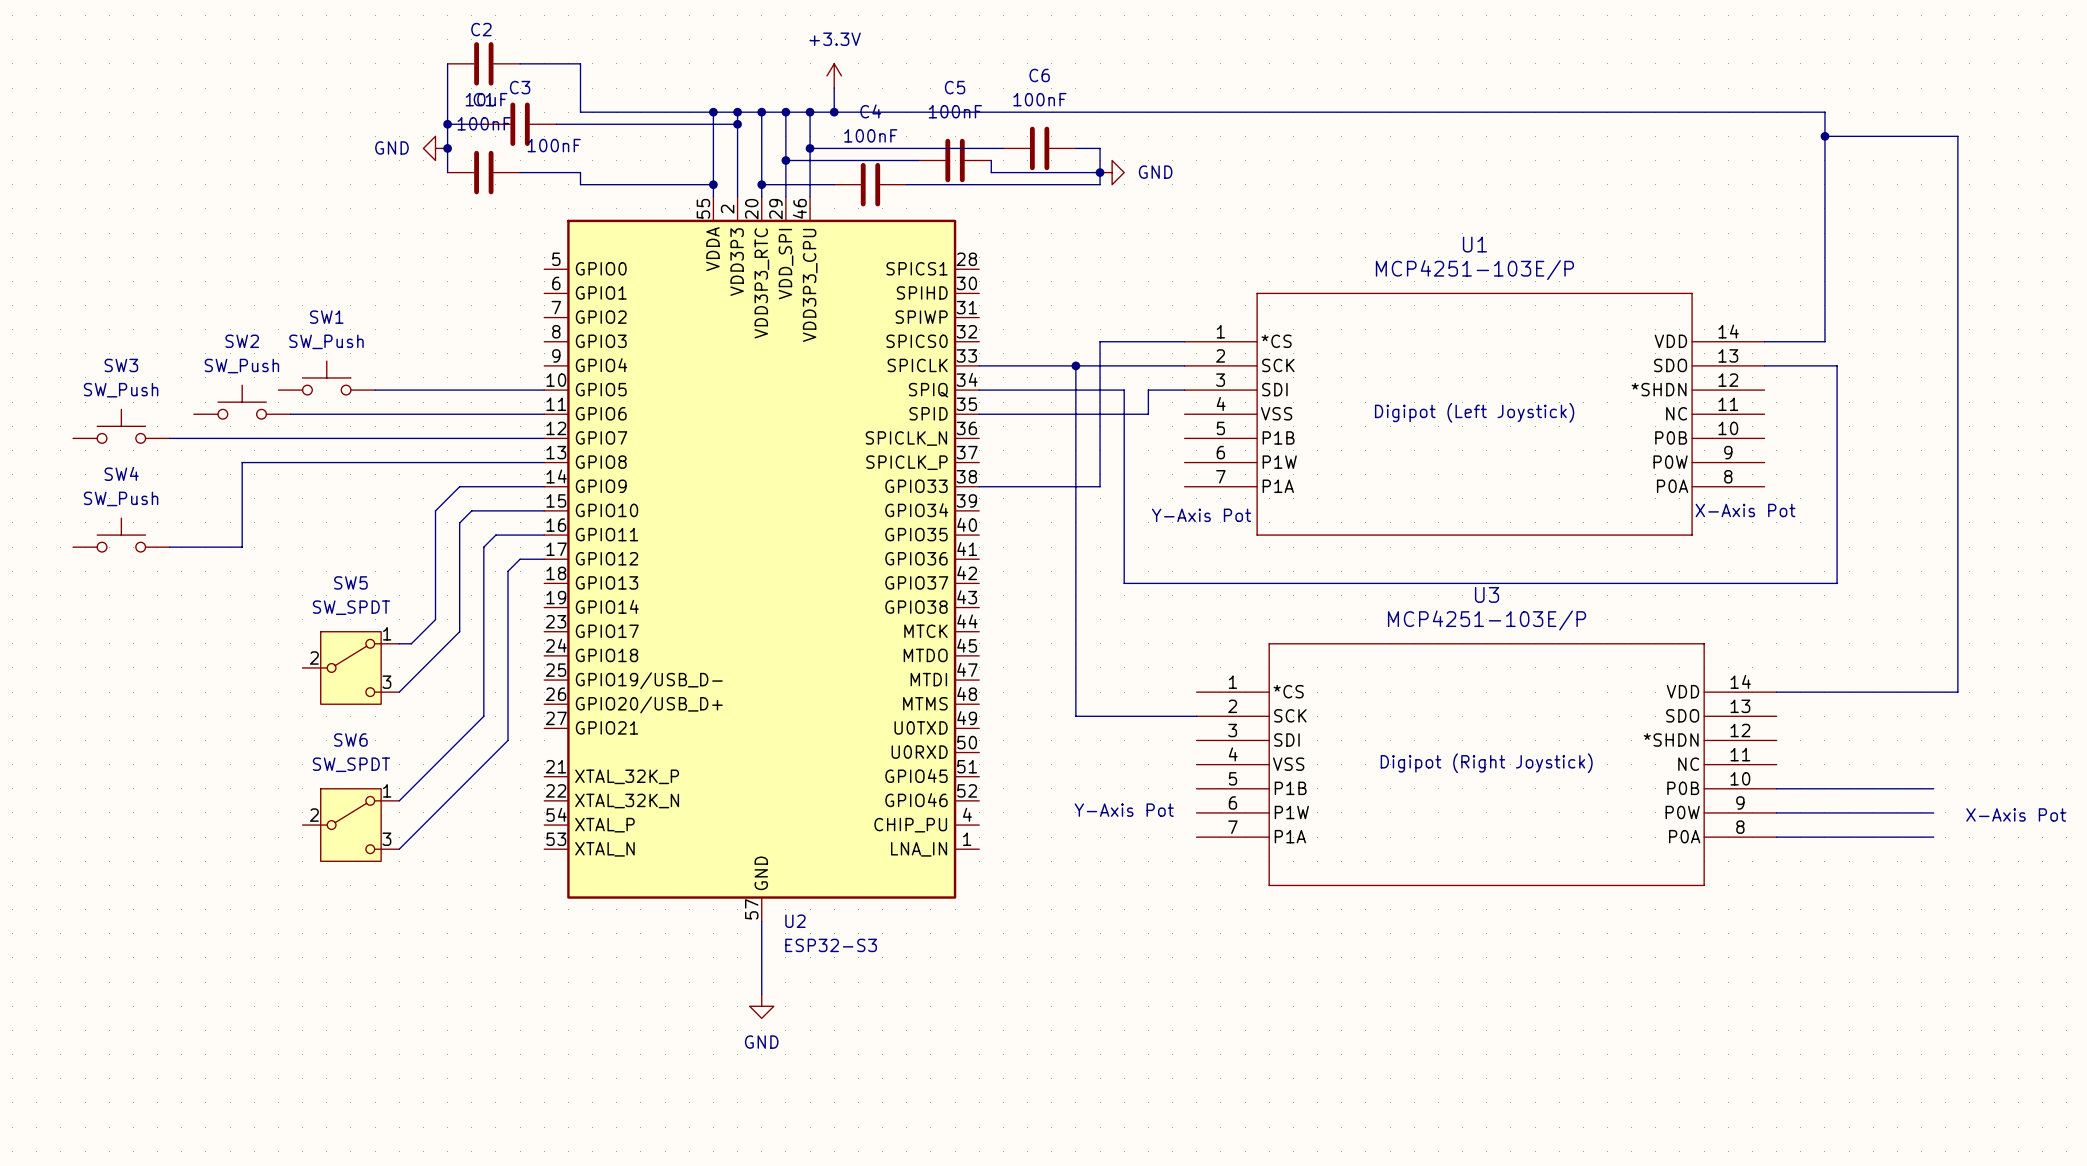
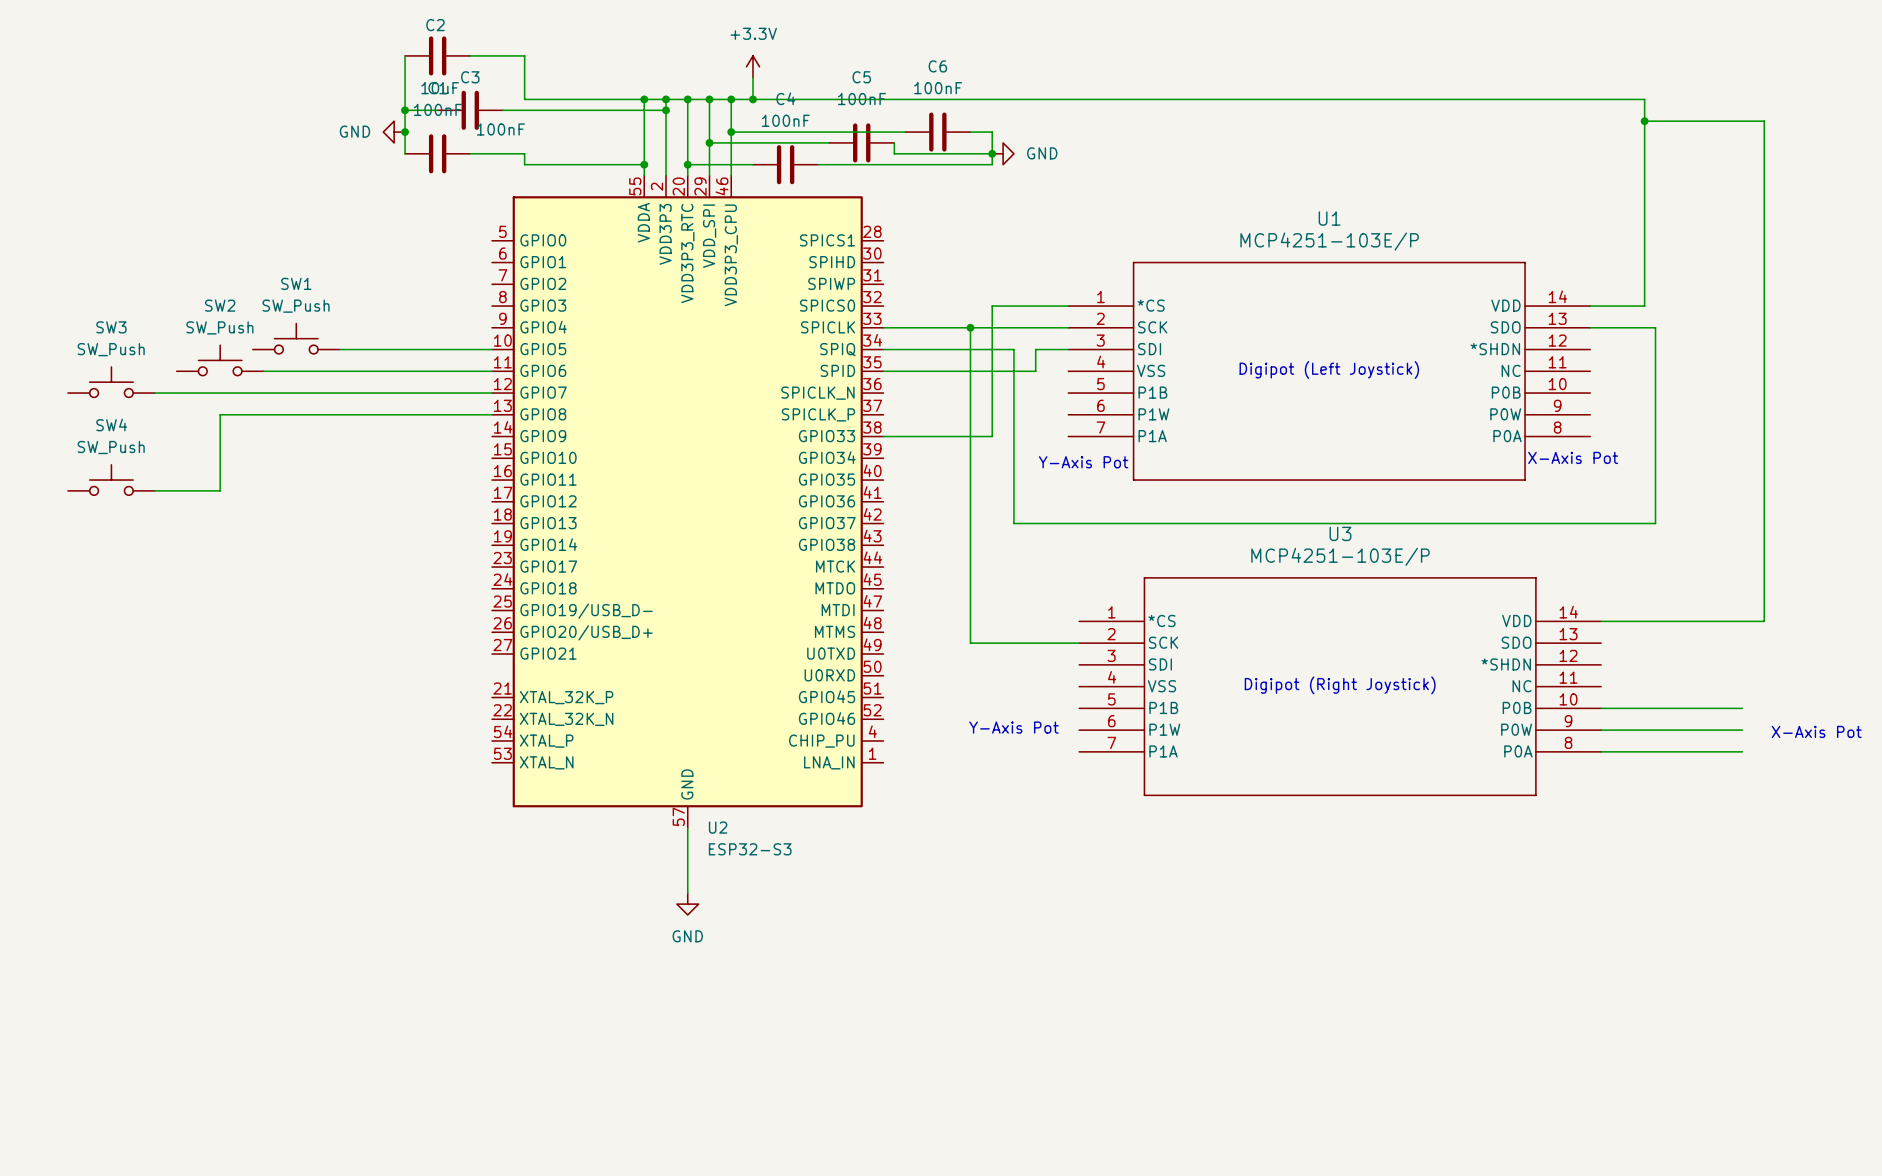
wire: (544, 486) (459, 486) (435, 510) (435, 619) (411, 643) (399, 643) -> none
wire: (544, 510) (471, 510) (459, 522) (459, 631) (399, 692) -> none
wire: (544, 535) (495, 535) (483, 547) (483, 716) (399, 800) -> none
wire: (544, 559) (520, 559) (508, 571) (508, 740) (399, 849) -> none
SW5: SW_SPDT (350, 667) -> none
SW6: SW_SPDT (350, 825) -> none

